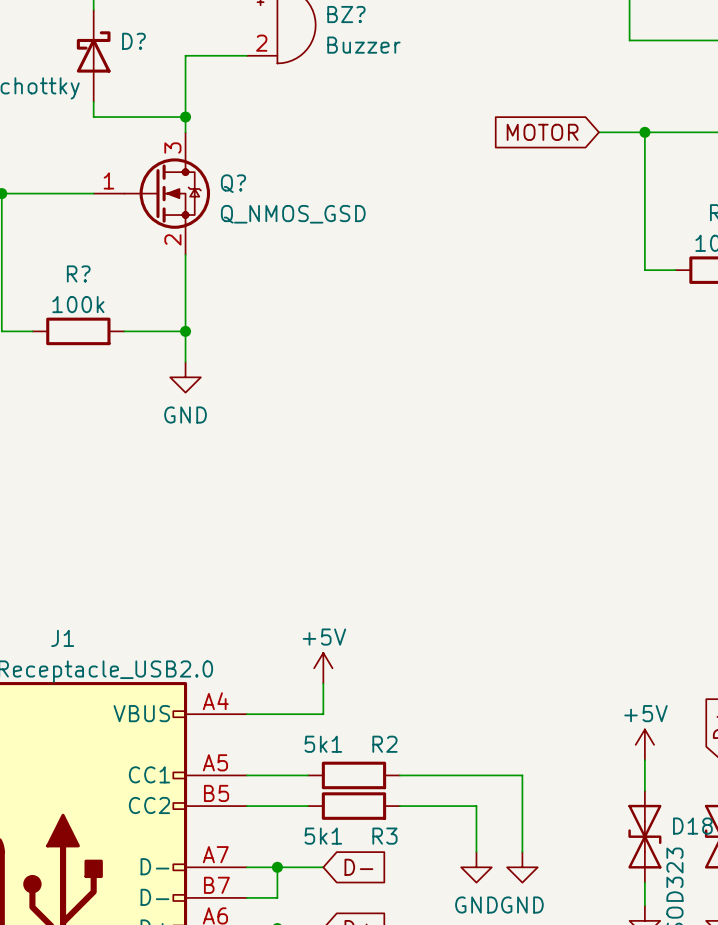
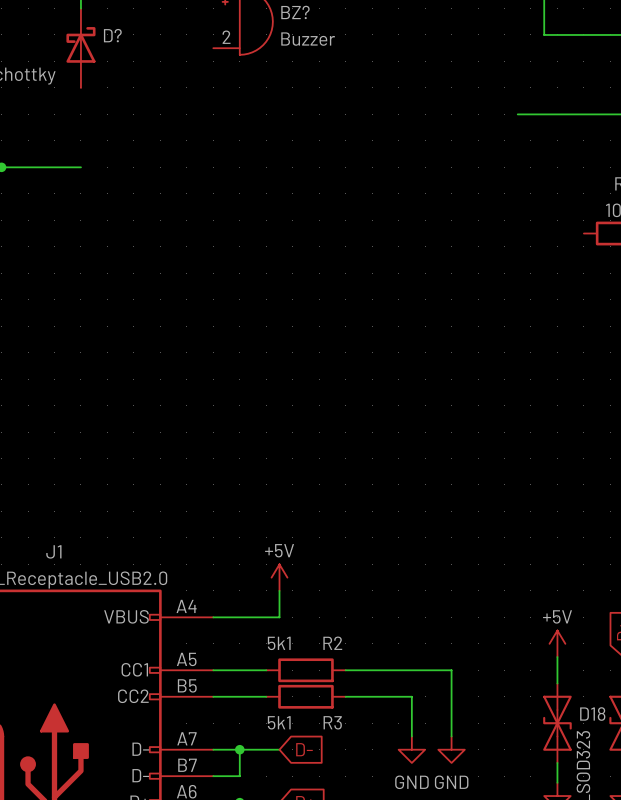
wire: (246, 55) (185, 55) (185, 132) -> none
wire: (93, 101) (93, 117) (185, 117) -> none
junction: (185, 117) -> none
global label: MOTOR (542, 132) -> none
wire: (644, 132) (644, 270) (675, 270) -> none
junction: (644, 132) -> none
wire: (1, 193) (1, 331) (32, 331) -> none
Q?: Q_NMOS_GSD (151, 193) -> none
wire: (185, 254) (185, 362) -> none
R?: 100k (78, 331) -> none
wire: (124, 331) (185, 331) -> none
junction: (185, 331) -> none
power symbol: GND (185, 377) -> none

